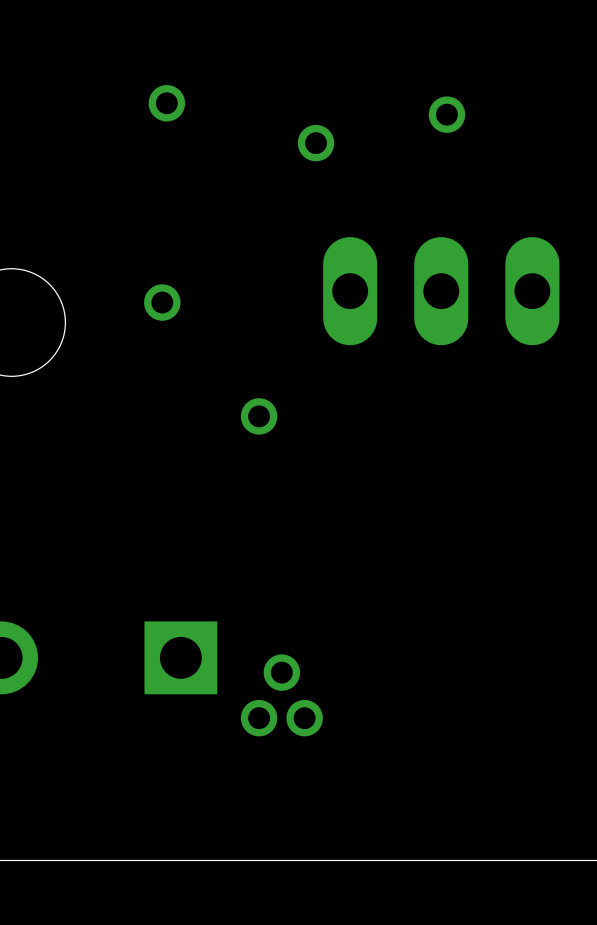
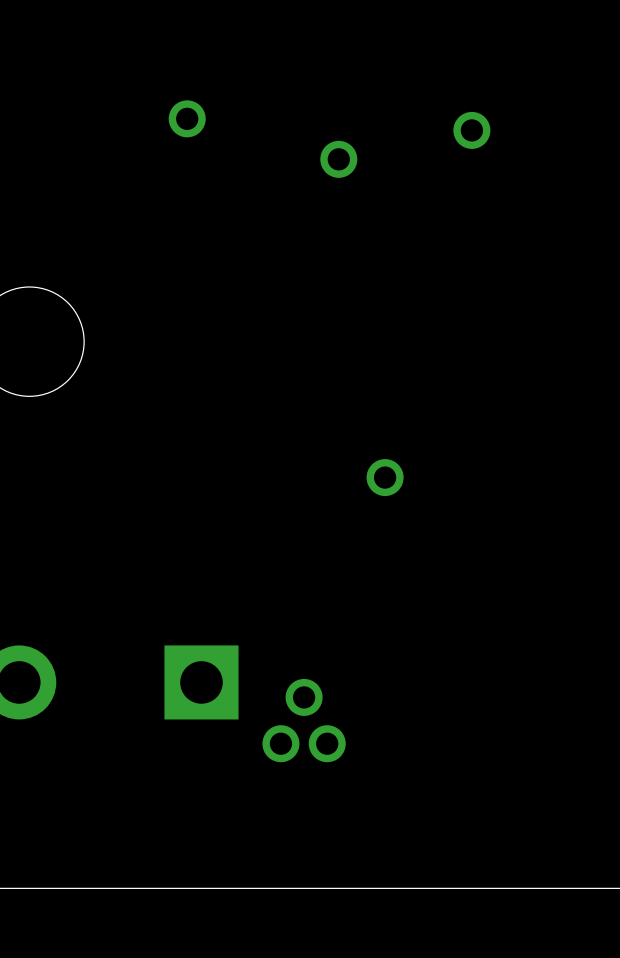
part: (441, 291) -> none
via: (162, 302) -> none
via position: (259, 416) -> (385, 477)

